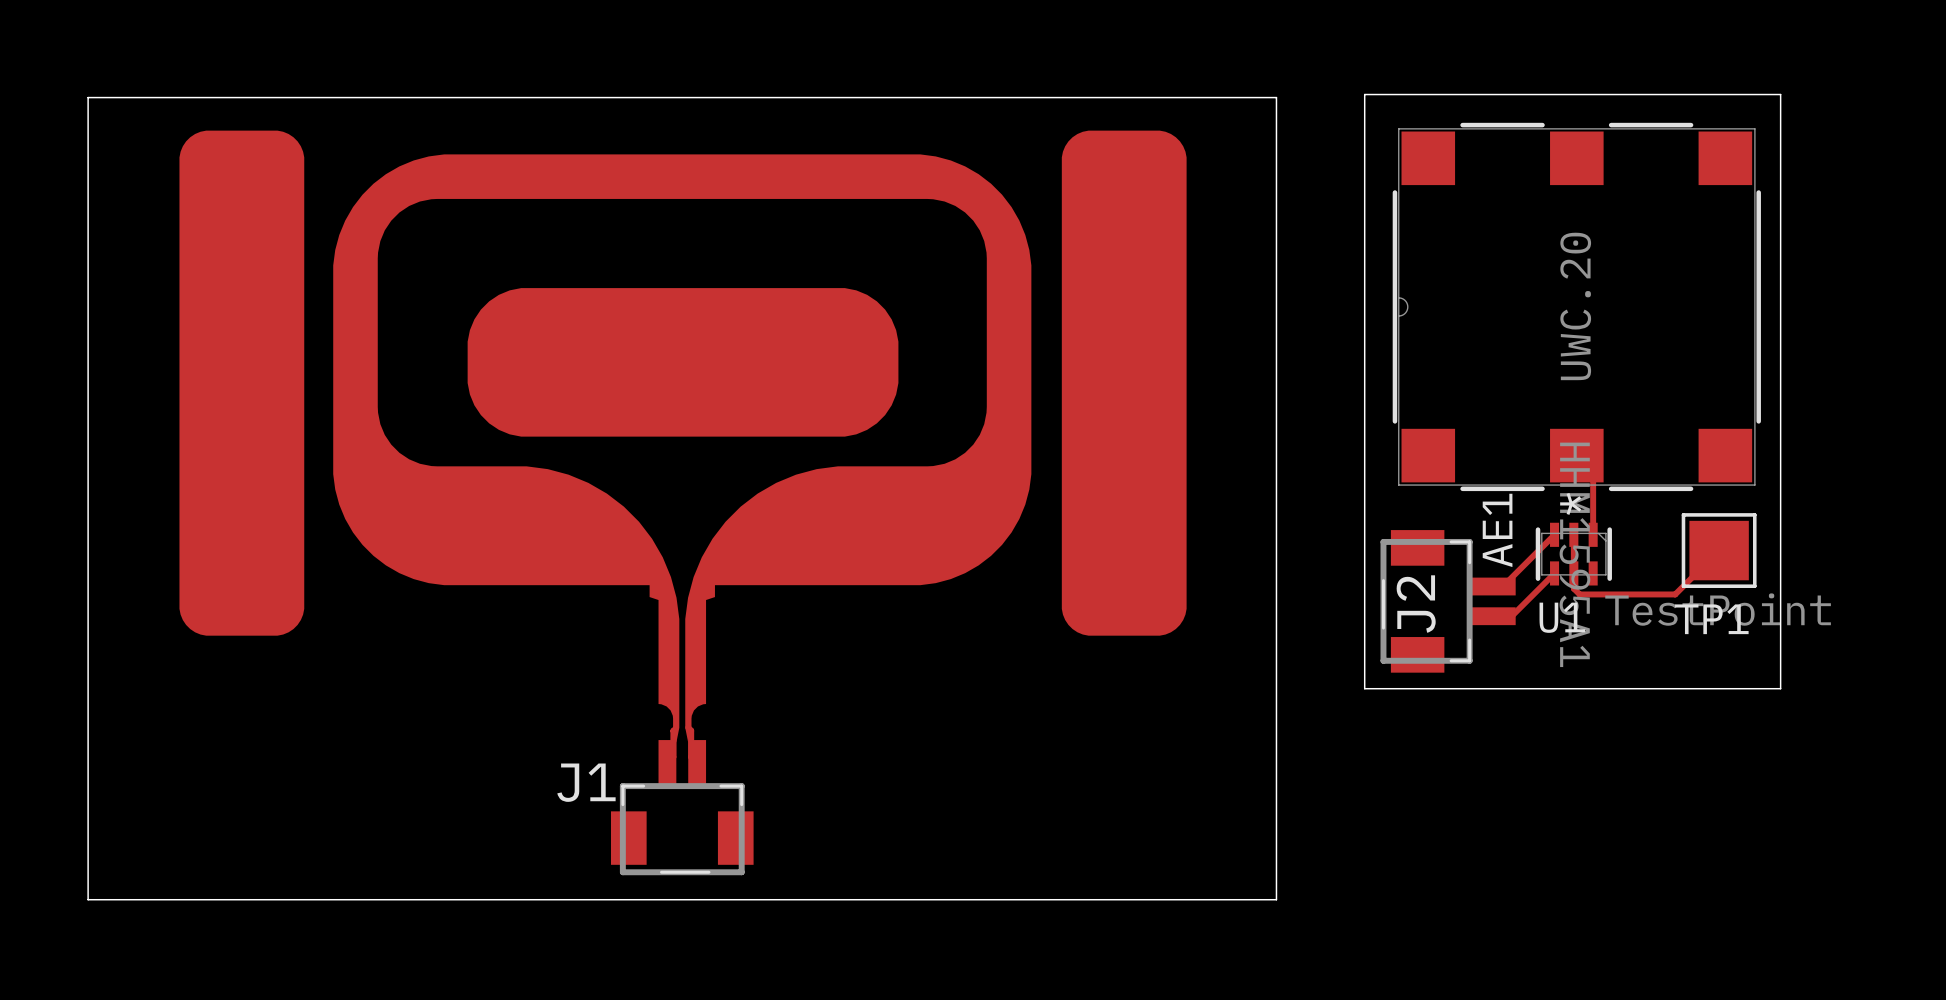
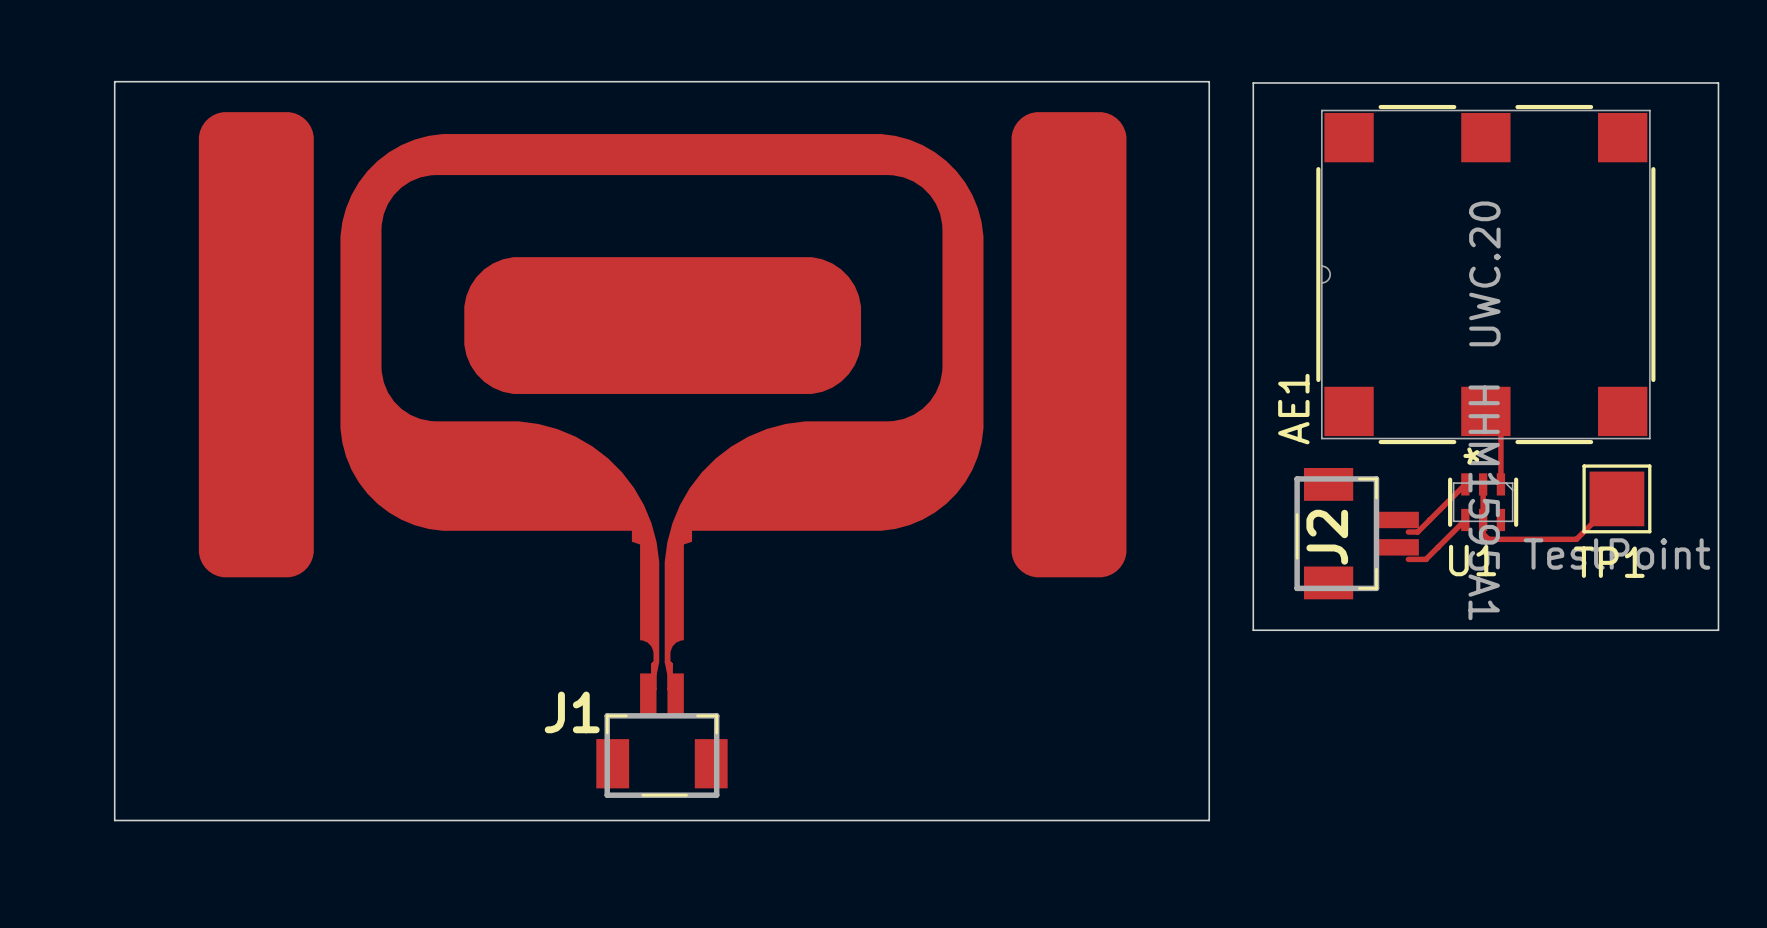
board edge: (1364, 94) (1780, 94) (1780, 688) (1364, 688) (1364, 94) -> (1253, 82) (1253, 630) (1718, 630) (1718, 82) (1253, 82)
AE1 name position: AE1 (1497, 530) -> AE1 (1293, 409)
J2 position: (1448, 601) -> (1356, 533)

